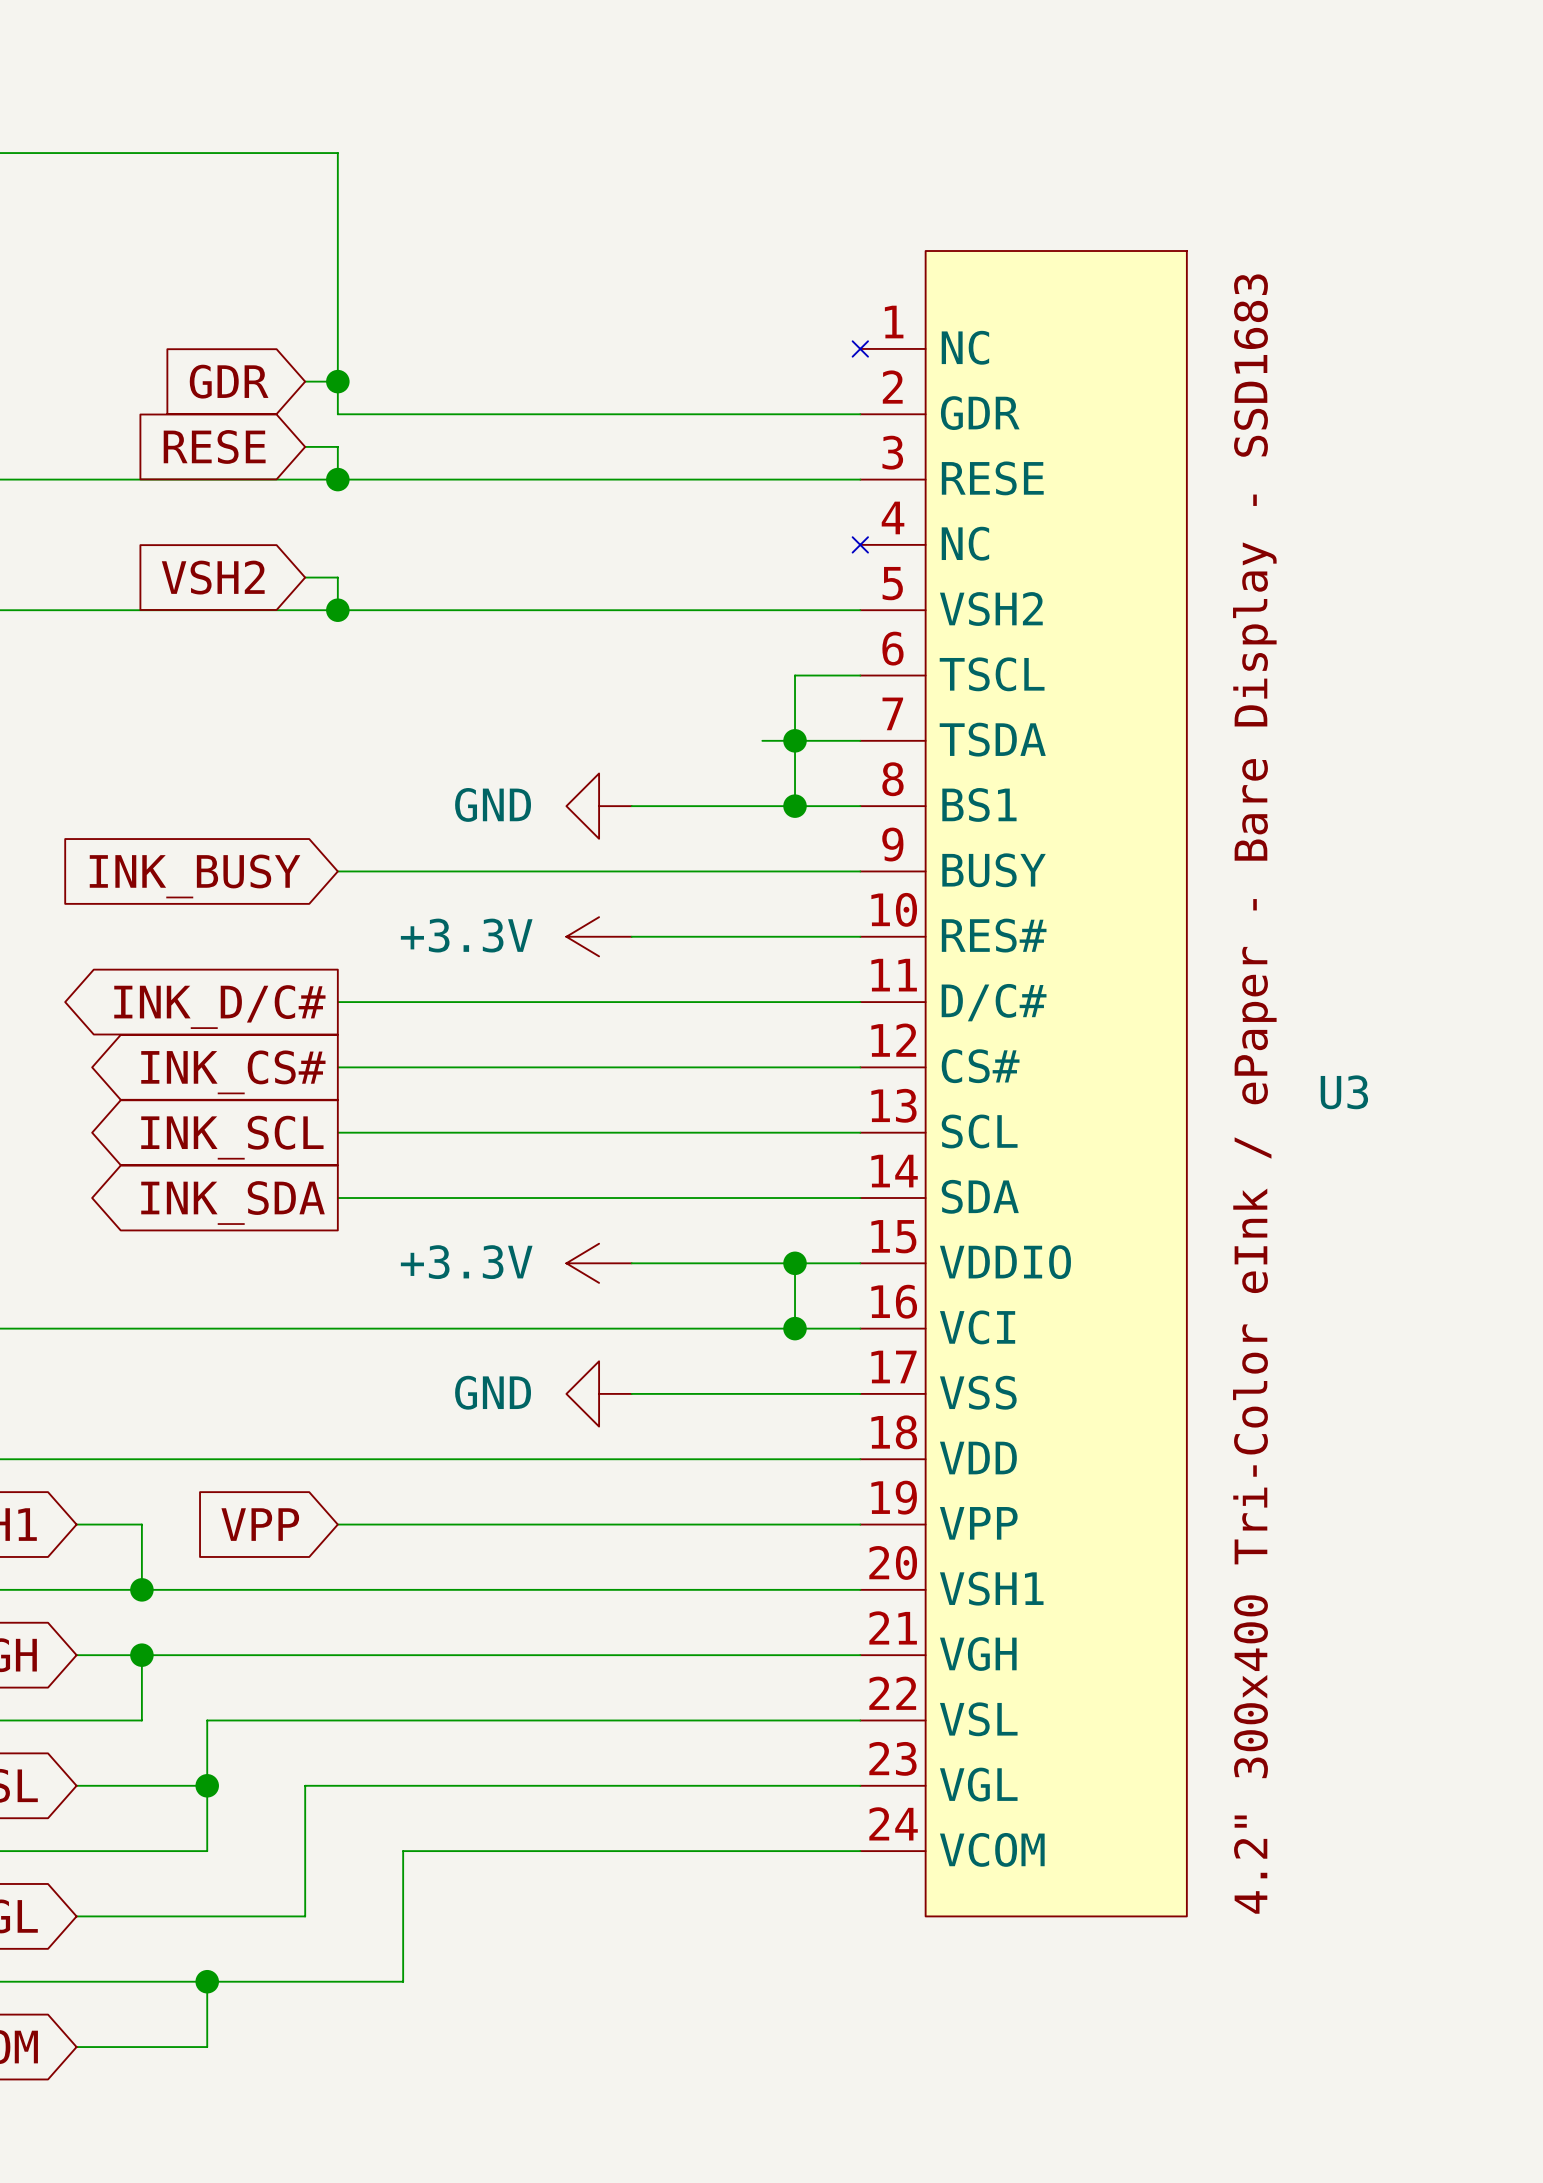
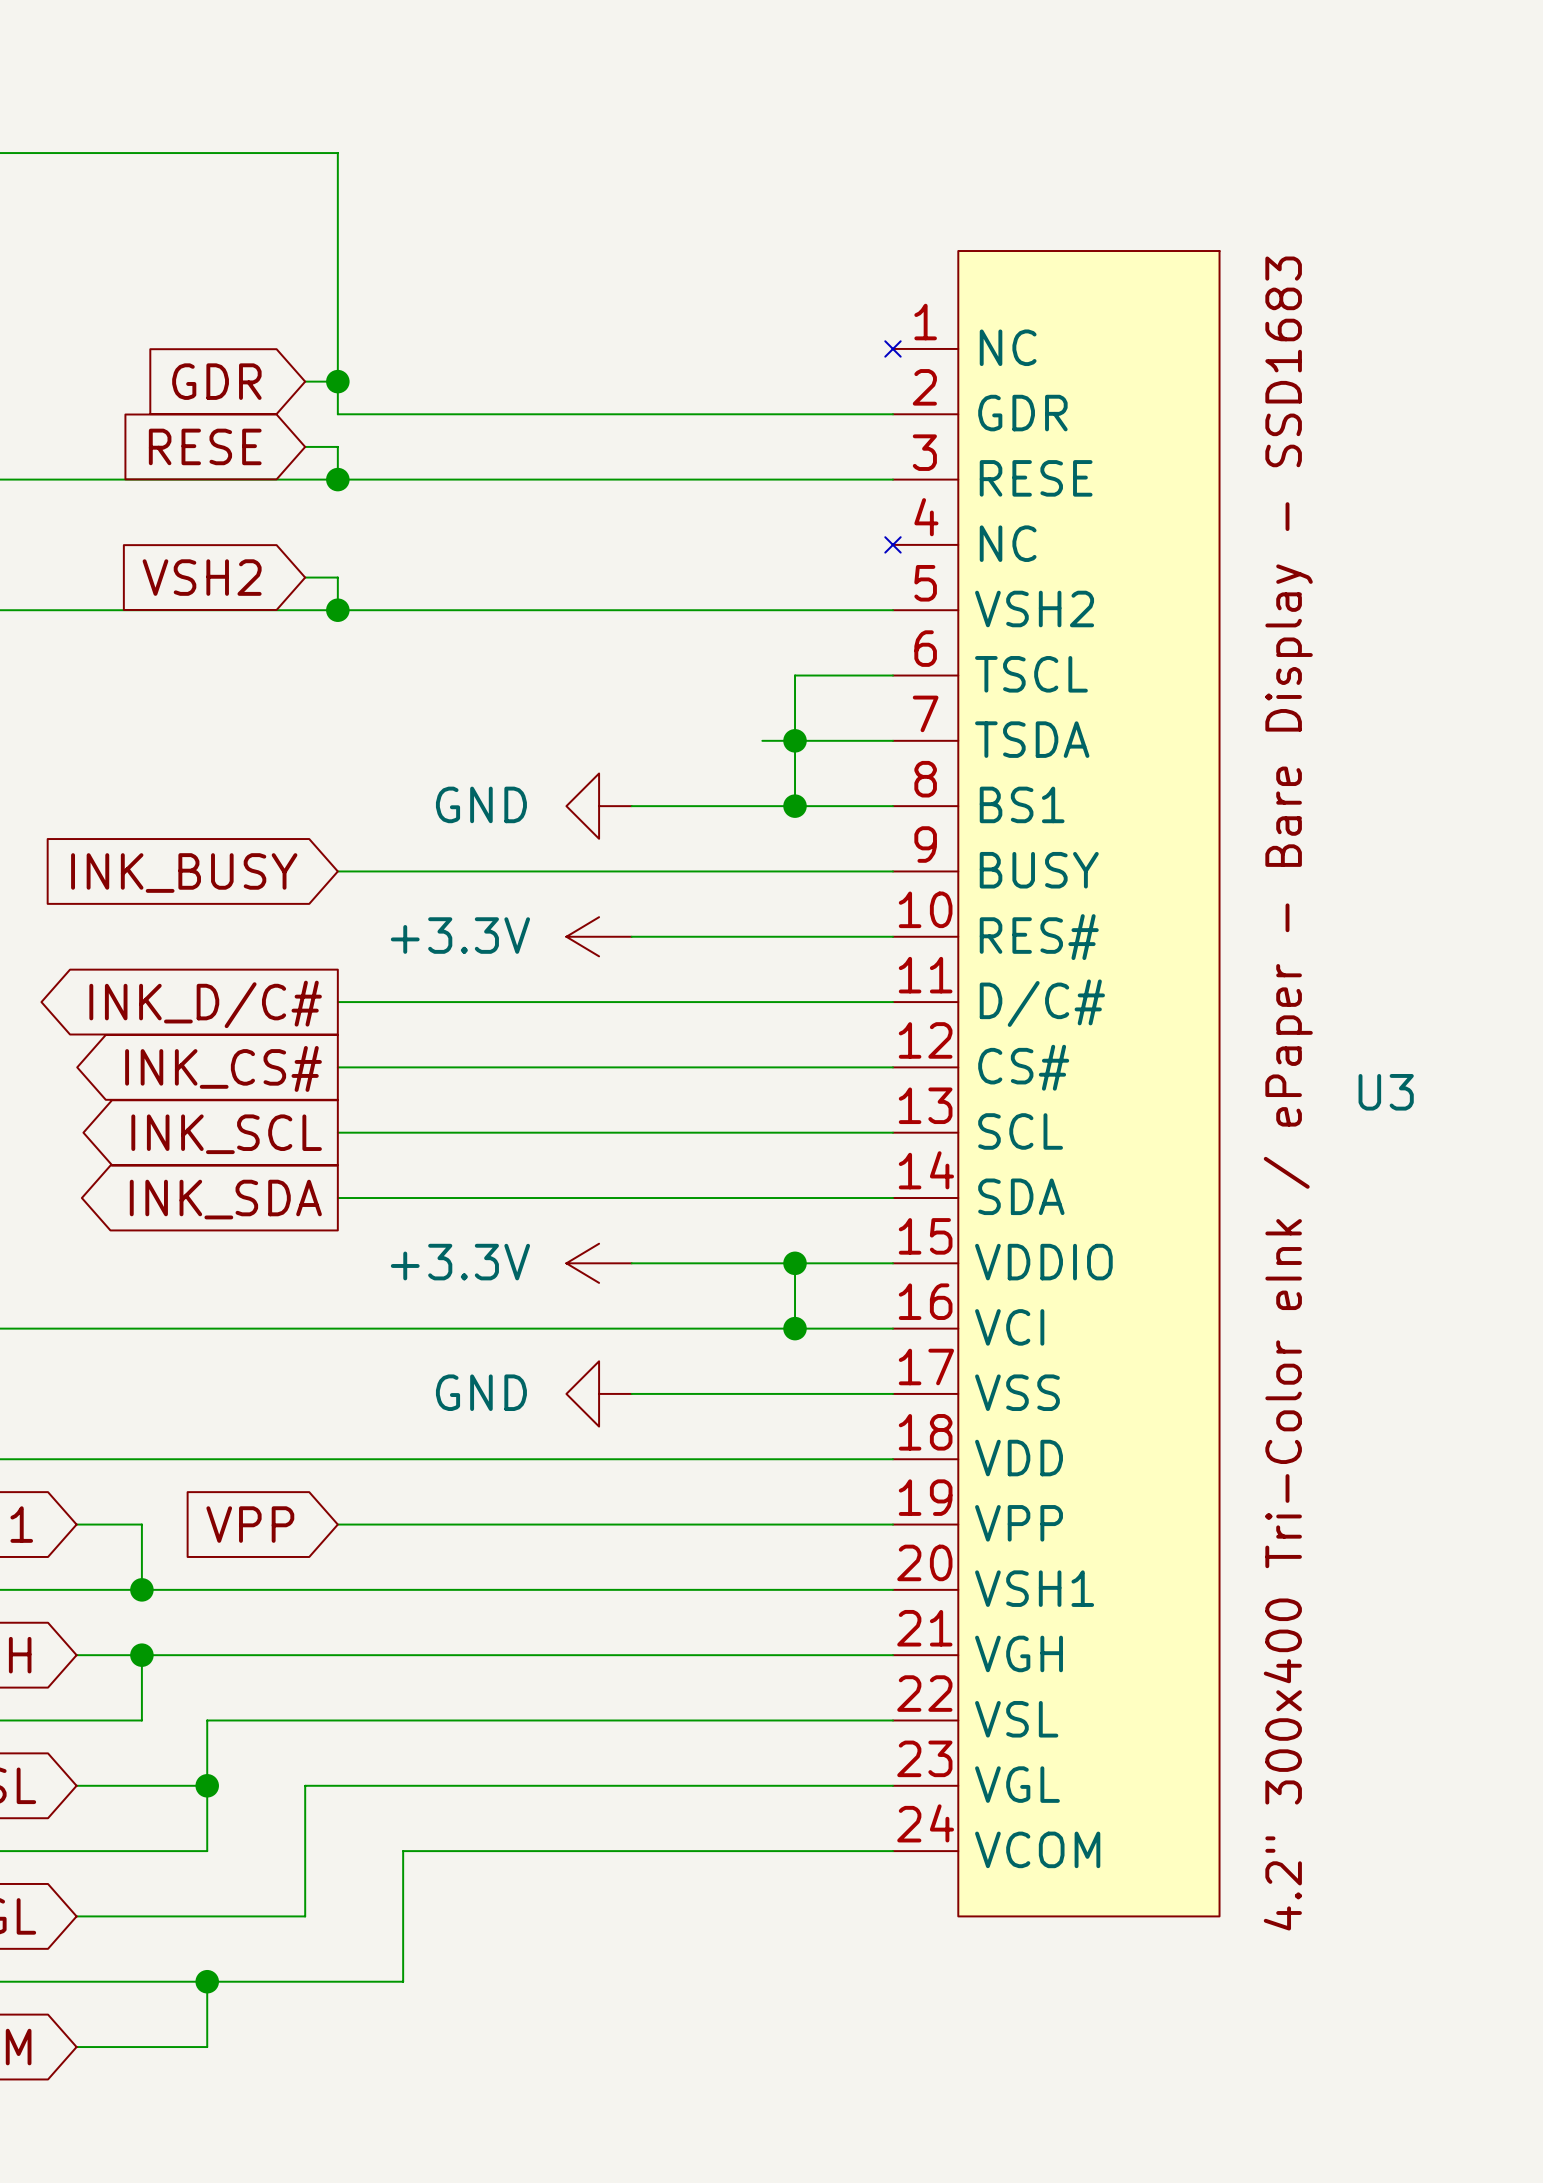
U3 position: (1019, 1083) -> (1052, 1083)

